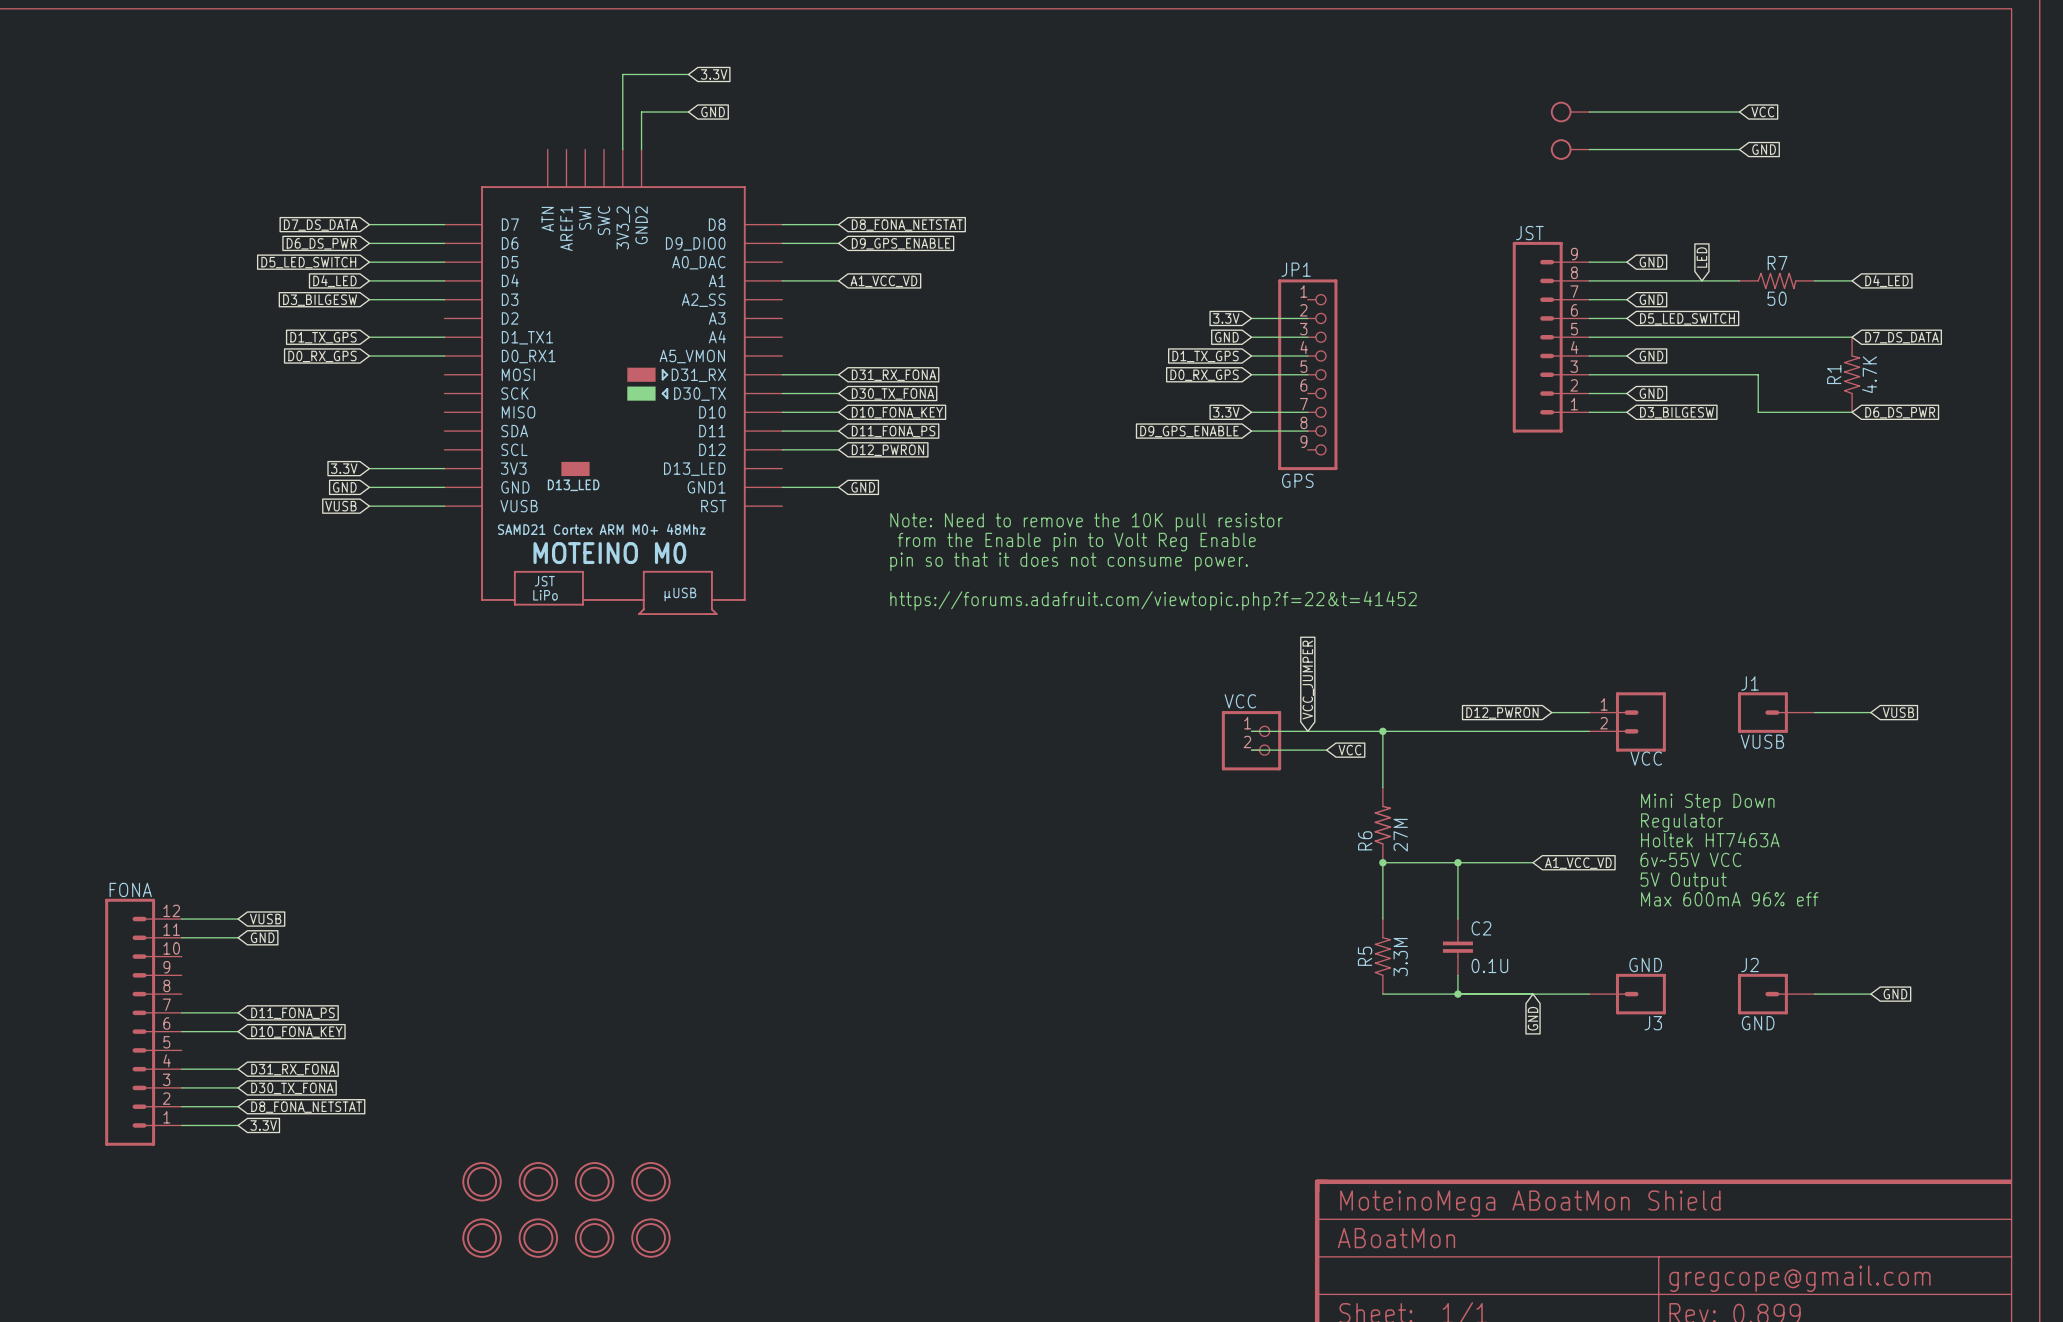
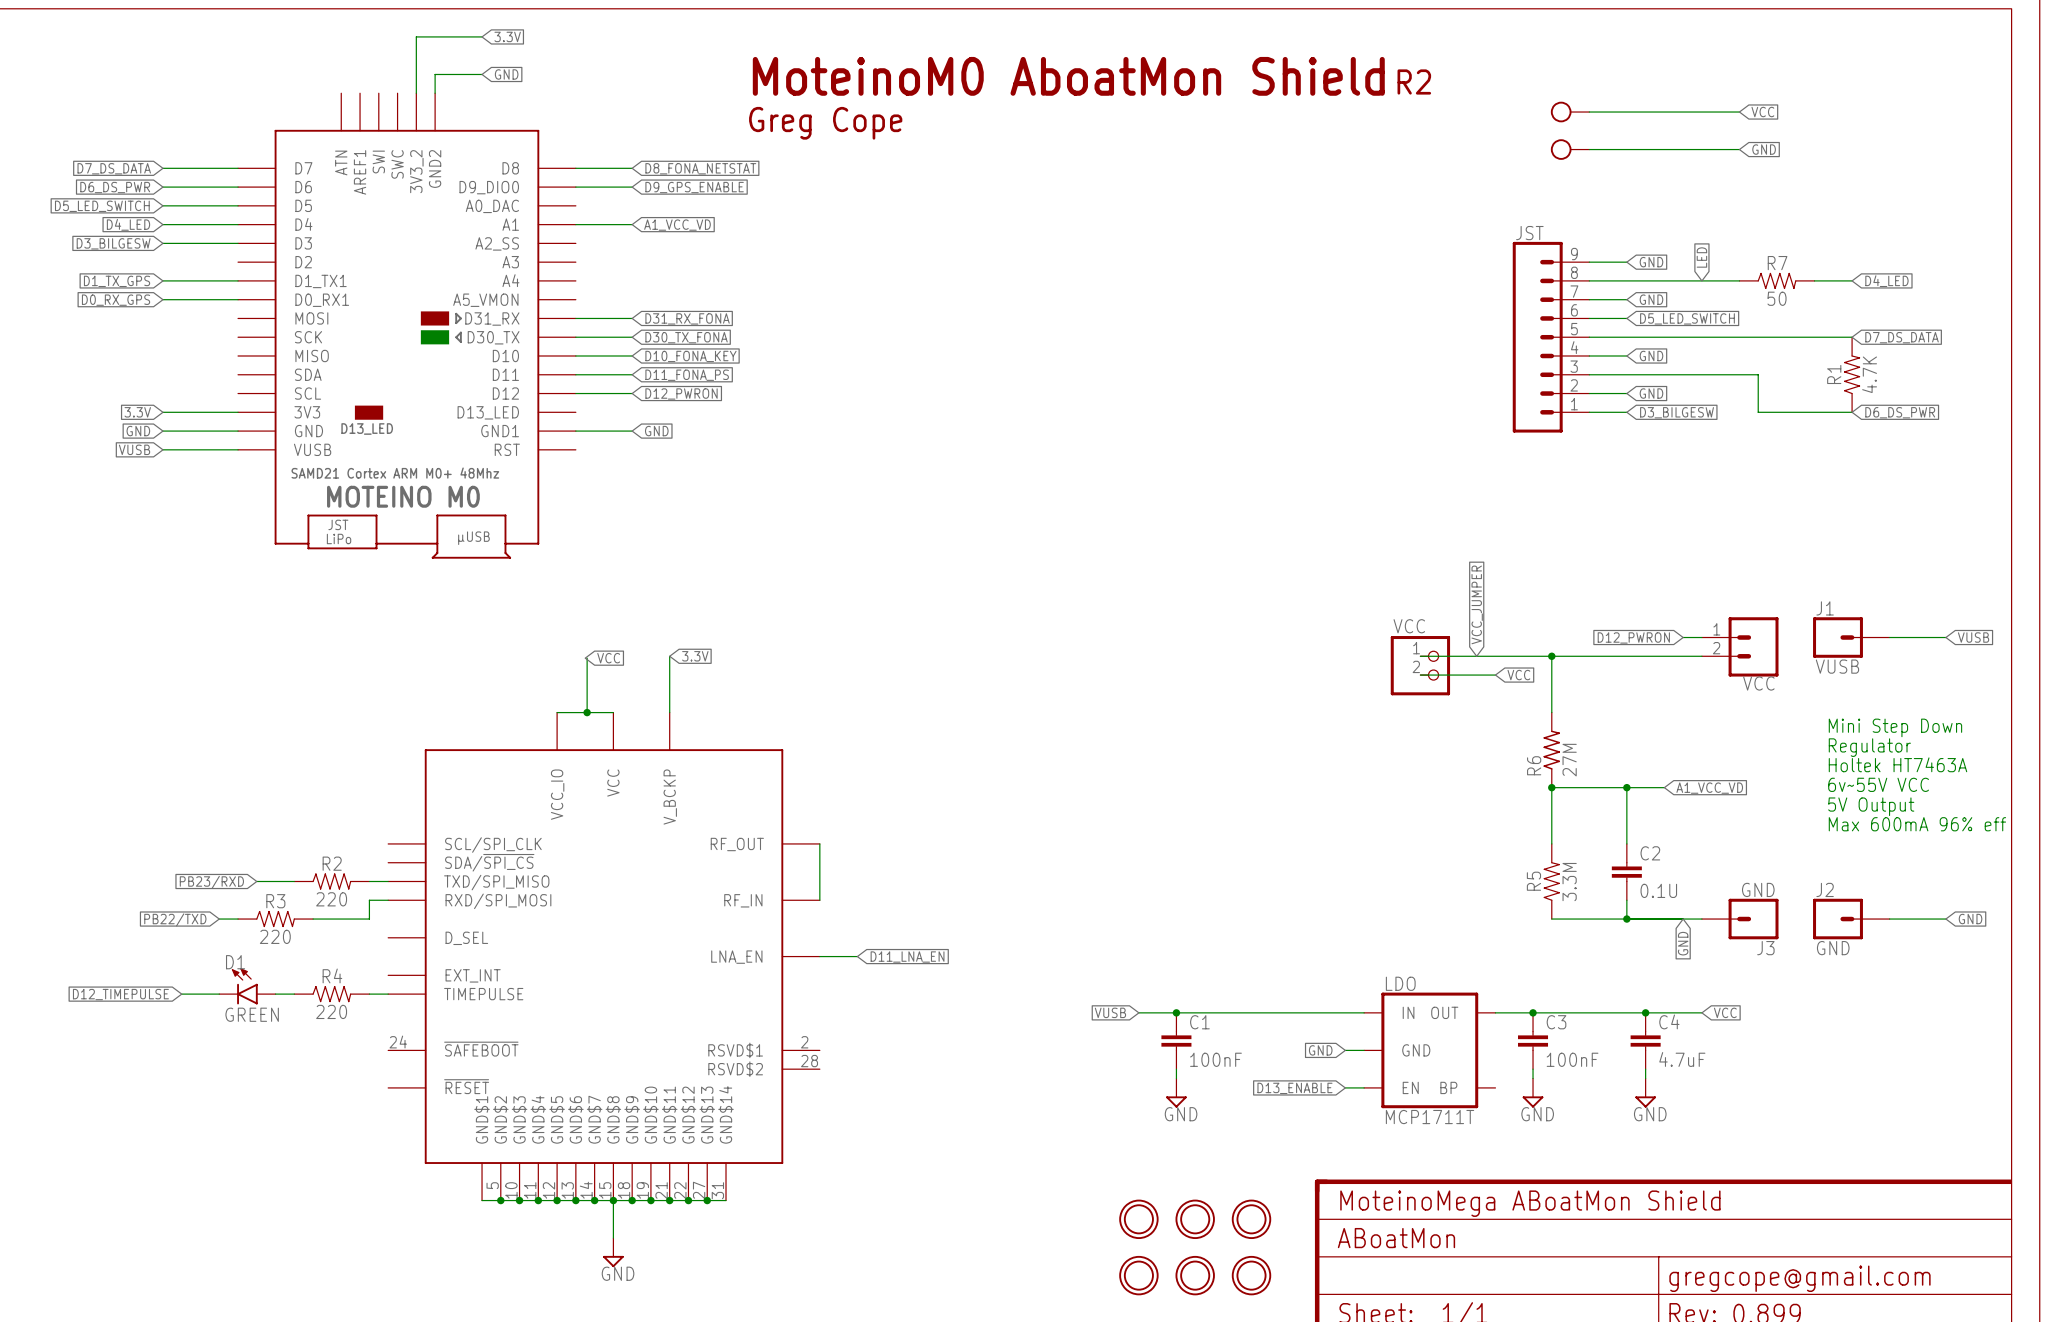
wire: none -> (482, 36) (416, 36) (416, 93)
global label: none -> 3.3V (507, 36)
wire: none -> (482, 74) (435, 74) (435, 93)
global label: none -> GND (506, 74)
wire: (688, 74) (622, 74) (622, 149) -> none
global label: 3.3V (714, 74) -> none
text: none -> MoteinoM0 AboatMon Shield (1068, 76)
text: none -> R2 (1414, 81)
wire: (688, 112) (641, 112) (641, 149) -> none
global label: GND (713, 112) -> none
text: none -> Greg Cope (825, 123)
global label: none -> D7_DS_DATA (114, 168)
wire: none -> (162, 168) (238, 168)
wire: none -> (575, 168) (632, 168)
global label: none -> D8_FONA_NETSTAT (700, 168)
global label: none -> D6_DS_PWR (115, 187)
wire: none -> (162, 187) (238, 187)
global label: none -> D9_GPS_ENABLE (694, 187)
wire: none -> (162, 205) (238, 205)
global label: none -> D5_LED_SWITCH (102, 206)
global label: none -> D4_LED (128, 224)
wire: none -> (162, 224) (238, 224)
wire: (369, 224) (444, 224) -> none
wire: none -> (575, 224) (632, 224)
wire: (782, 224) (838, 224) -> none
global label: D7_DS_DATA (320, 225) -> none
global label: none -> A1_VCC_VD (677, 225)
global label: D8_FONA_NETSTAT (907, 225) -> none
global label: none -> D3_BILGESW (113, 243)
wire: none -> (162, 243) (238, 243)
global label: D6_DS_PWR (321, 243) -> none
wire: (369, 243) (444, 243) -> none
wire: (782, 243) (838, 243) -> none
global label: D9_GPS_ENABLE (901, 243) -> none
global label: D5_LED_SWITCH (308, 262) -> none
wire: (369, 262) (444, 262) -> none
wire: none -> (162, 280) (238, 280)
wire: (369, 280) (444, 280) -> none
wire: (782, 280) (838, 280) -> none
global label: none -> D1_TX_GPS (117, 281)
global label: D4_LED (334, 281) -> none
global label: A1_VCC_VD (883, 281) -> none
wire: none -> (162, 299) (238, 299)
wire: (369, 299) (444, 299) -> none
global label: none -> D0_RX_GPS (116, 300)
global label: D3_BILGESW (320, 300) -> none
wire: none -> (575, 318) (632, 318)
global label: none -> D31_RX_FONA (687, 318)
global label: 3.3V (1226, 318) -> none
wire: (1251, 318) (1307, 318) -> none
part: none -> (406, 325)
global label: D1_TX_GPS (323, 337) -> none
wire: (369, 337) (444, 337) -> none
wire: none -> (575, 337) (632, 337)
global label: none -> D30_TX_FONA (686, 337)
global label: GND (1226, 337) -> none
wire: (1251, 337) (1307, 337) -> none
wire: (369, 355) (444, 355) -> none
wire: none -> (575, 355) (632, 355)
wire: (1251, 355) (1307, 355) -> none
global label: D0_RX_GPS (322, 356) -> none
global label: none -> D10_FONA_KEY (690, 356)
global label: D1_TX_GPS (1205, 356) -> none
wire: none -> (575, 374) (632, 374)
wire: (782, 374) (838, 374) -> none
wire: (1251, 374) (1307, 374) -> none
JP1: GPS (1307, 374) -> none
global label: none -> D11_FONA_PS (687, 375)
global label: D31_RX_FONA (894, 375) -> none
global label: D0_RX_GPS (1204, 375) -> none
part: (613, 382) -> none
wire: none -> (575, 393) (632, 393)
global label: none -> D12_PWRON (681, 393)
wire: (782, 393) (838, 393) -> none
global label: D30_TX_FONA (892, 393) -> none
global label: none -> 3.3V (137, 412)
wire: none -> (162, 412) (238, 412)
wire: (782, 412) (838, 412) -> none
global label: D10_FONA_KEY (897, 412) -> none
global label: 3.3V (1226, 412) -> none
wire: (1251, 412) (1307, 412) -> none
global label: none -> GND (138, 431)
wire: none -> (162, 431) (238, 431)
wire: none -> (575, 431) (632, 431)
global label: none -> GND (656, 431)
wire: (782, 431) (838, 431) -> none
global label: D11_FONA_PS (893, 431) -> none
global label: D9_GPS_ENABLE (1189, 431) -> none
wire: (1251, 431) (1307, 431) -> none
global label: none -> VUSB (134, 449)
wire: none -> (162, 449) (238, 449)
wire: (782, 449) (838, 449) -> none
global label: D12_PWRON (887, 450) -> none
global label: 3.3V (344, 468) -> none
wire: (369, 468) (444, 468) -> none
global label: GND (344, 487) -> none
wire: (369, 487) (444, 487) -> none
wire: (782, 487) (838, 487) -> none
global label: GND (863, 487) -> none
global label: VUSB (340, 506) -> none
wire: (369, 506) (444, 506) -> none
text: Note: Need to remove the 10K pull resistor (1086, 522) -> none
text: from the Enable pin to Volt Reg Enable (1076, 542) -> none
text: pin so that it does not consume power. (1069, 561) -> none
text: https://forums.adafruit.com/viewtopic.php?f=22&t=41452 (1153, 600) -> none
global label: none -> VCC_JUMPER (1477, 604)
wire: none -> (1683, 637) (1701, 637)
wire: none -> (669, 656) (669, 712)
global label: none -> 3.3V (695, 656)
wire: none -> (1420, 656) (1701, 656)
junction: none -> (1551, 656)
wire: none -> (587, 658) (587, 712)
global label: none -> VCC (608, 658)
VCC: none -> (1420, 665)
wire: none -> (1420, 675) (1495, 675)
global label: none -> VCC (1518, 675)
global label: VCC_JUMPER (1308, 679) -> none
wire: none -> (557, 712) (613, 712)
junction: none -> (587, 712)
wire: (1551, 712) (1589, 712) -> (1551, 712) (1551, 656)
J1 position: (1776, 712) -> (1851, 637)
wire: (1814, 712) (1870, 712) -> (1889, 637) (1945, 637)
global label position: VUSB (1898, 712) -> VUSB (1973, 637)
global label position: D12_PWRON (1502, 713) -> D12_PWRON (1633, 637)
part position: (1627, 721) -> (1740, 646)
text: none -> Mini Step Down (1895, 727)
wire: (1251, 731) (1589, 731) -> none
wire: (1382, 731) (1382, 787) -> none
junction: (1382, 731) -> none
VCC: (1251, 740) -> none
text: none -> Regulator (1869, 747)
wire: (1251, 750) (1326, 750) -> none
global label: VCC (1349, 750) -> none
text: none -> Holtek HT7463A (1897, 764)
text: none -> 6v~55V VCC (1878, 784)
junction: none -> (1551, 787)
wire: none -> (1626, 787) (1626, 843)
junction: none -> (1626, 787)
wire: none -> (1664, 787) (1551, 787) (1551, 843)
text: Mini Step Down (1707, 802) -> none
text: none -> 5V Output (1871, 806)
text: Regulator (1682, 822) -> none
text: none -> Max 600mA 96% eff (1917, 824)
R6 position: (1382, 825) -> (1551, 750)
text: Holtek HT7463A (1710, 839) -> none
wire: none -> (819, 843) (819, 900)
text: 6v~55V VCC (1690, 859) -> none
junction: (1382, 862) -> none
wire: (1457, 862) (1457, 919) -> none
junction: (1457, 862) -> none
wire: (1533, 862) (1382, 862) (1382, 919) -> none
global label position: A1_VCC_VD (1578, 863) -> A1_VCC_VD (1709, 788)
wire: none -> (256, 881) (294, 881)
R2: none -> 220 (331, 881)
wire: none -> (369, 881) (388, 881)
text: 5V Output (1683, 881) -> none
global label: none -> PB23/RXD (211, 882)
text: Max 600mA 96% eff (1729, 899) -> none
wire: none -> (388, 900) (369, 900) (369, 919) (313, 919)
wire: none -> (1626, 900) (1626, 919)
global label: none -> PB22/TXD (175, 919)
wire: (181, 919) (219, 919) -> (181, 994) (219, 994)
global label: VUSB (265, 919) -> none
R3: none -> 220 (275, 919)
wire: none -> (1551, 919) (1701, 919)
junction: none -> (1626, 919)
global label: none -> GND (1970, 919)
wire: (181, 937) (238, 937) -> none
global label: GND (262, 937) -> none
global label: none -> GND (1683, 943)
C2 position: (1457, 947) -> (1626, 872)
part: none -> (604, 956)
wire: none -> (819, 956) (857, 956)
R5 position: (1382, 956) -> (1551, 881)
global label: none -> D11_LNA_EN (907, 957)
wire: (1457, 975) (1457, 994) -> none
D1: none -> GREEN (247, 986)
global label: none -> D12_TIMEPULSE (120, 994)
wire: none -> (275, 994) (294, 994)
R4: none -> 220 (331, 994)
wire: none -> (369, 994) (388, 994)
wire: (1382, 994) (1589, 994) -> (1495, 1012) (1701, 1012)
junction: (1457, 994) -> none
J3 position: (1627, 994) -> (1740, 919)
J2 position: (1776, 994) -> (1851, 919)
wire: (1814, 994) (1870, 994) -> (1889, 919) (1945, 919)
global label: GND (1895, 994) -> none
wire: (181, 1012) (238, 1012) -> none
global label: none -> VUSB (1110, 1012)
wire: none -> (1138, 1012) (1364, 1012)
junction: none -> (1176, 1012)
junction: none -> (1533, 1012)
junction: none -> (1645, 1012)
global label: none -> VCC (1725, 1012)
global label: D11_FONA_PS (293, 1013) -> none
global label: GND (1533, 1018) -> none
FONA: (143, 1022) -> none
wire: (181, 1031) (238, 1031) -> none
global label: D10_FONA_KEY (296, 1032) -> none
C1: none -> 100nF (1176, 1041)
C3: none -> 100nF (1533, 1041)
C4: none -> 4.7uF (1645, 1041)
global label: none -> GND (1320, 1050)
wire: none -> (1345, 1050) (1364, 1050)
LDO: none -> MCP1711T (1429, 1050)
wire: (181, 1069) (238, 1069) -> none
global label: D31_RX_FONA (293, 1069) -> none
wire: none -> (1176, 1069) (1176, 1078)
wire: none -> (1533, 1069) (1533, 1078)
wire: none -> (1645, 1069) (1645, 1078)
wire: (181, 1087) (238, 1087) -> none
wire: none -> (1345, 1087) (1364, 1087)
global label: D30_TX_FONA (292, 1088) -> none
global label: none -> D13_ENABLE (1294, 1088)
power symbol: none -> GND (1176, 1093)
power symbol: none -> GND (1533, 1093)
power symbol: none -> GND (1645, 1093)
wire: (181, 1106) (238, 1106) -> none
global label: D8_FONA_NETSTAT (306, 1107) -> none
wire: (181, 1125) (238, 1125) -> none
global label: 3.3V (263, 1125) -> none
part: (482, 1181) -> none
part: (538, 1181) -> none
part: (594, 1181) -> none
part: (650, 1181) -> none
wire: none -> (482, 1200) (726, 1200)
junction: none -> (500, 1200)
junction: none -> (519, 1200)
junction: none -> (538, 1200)
junction: none -> (557, 1200)
junction: none -> (575, 1200)
junction: none -> (594, 1200)
wire: none -> (613, 1200) (613, 1238)
junction: none -> (613, 1200)
junction: none -> (632, 1200)
junction: none -> (650, 1200)
junction: none -> (669, 1200)
junction: none -> (688, 1200)
junction: none -> (707, 1200)
part: none -> (1138, 1219)
part: none -> (1195, 1219)
part: none -> (1251, 1219)
part: (482, 1238) -> none
part: (538, 1238) -> none
part: (594, 1238) -> none
part: (650, 1238) -> none
power symbol: none -> GND (613, 1252)
part: none -> (1138, 1275)
part: none -> (1195, 1275)
part: none -> (1251, 1275)

